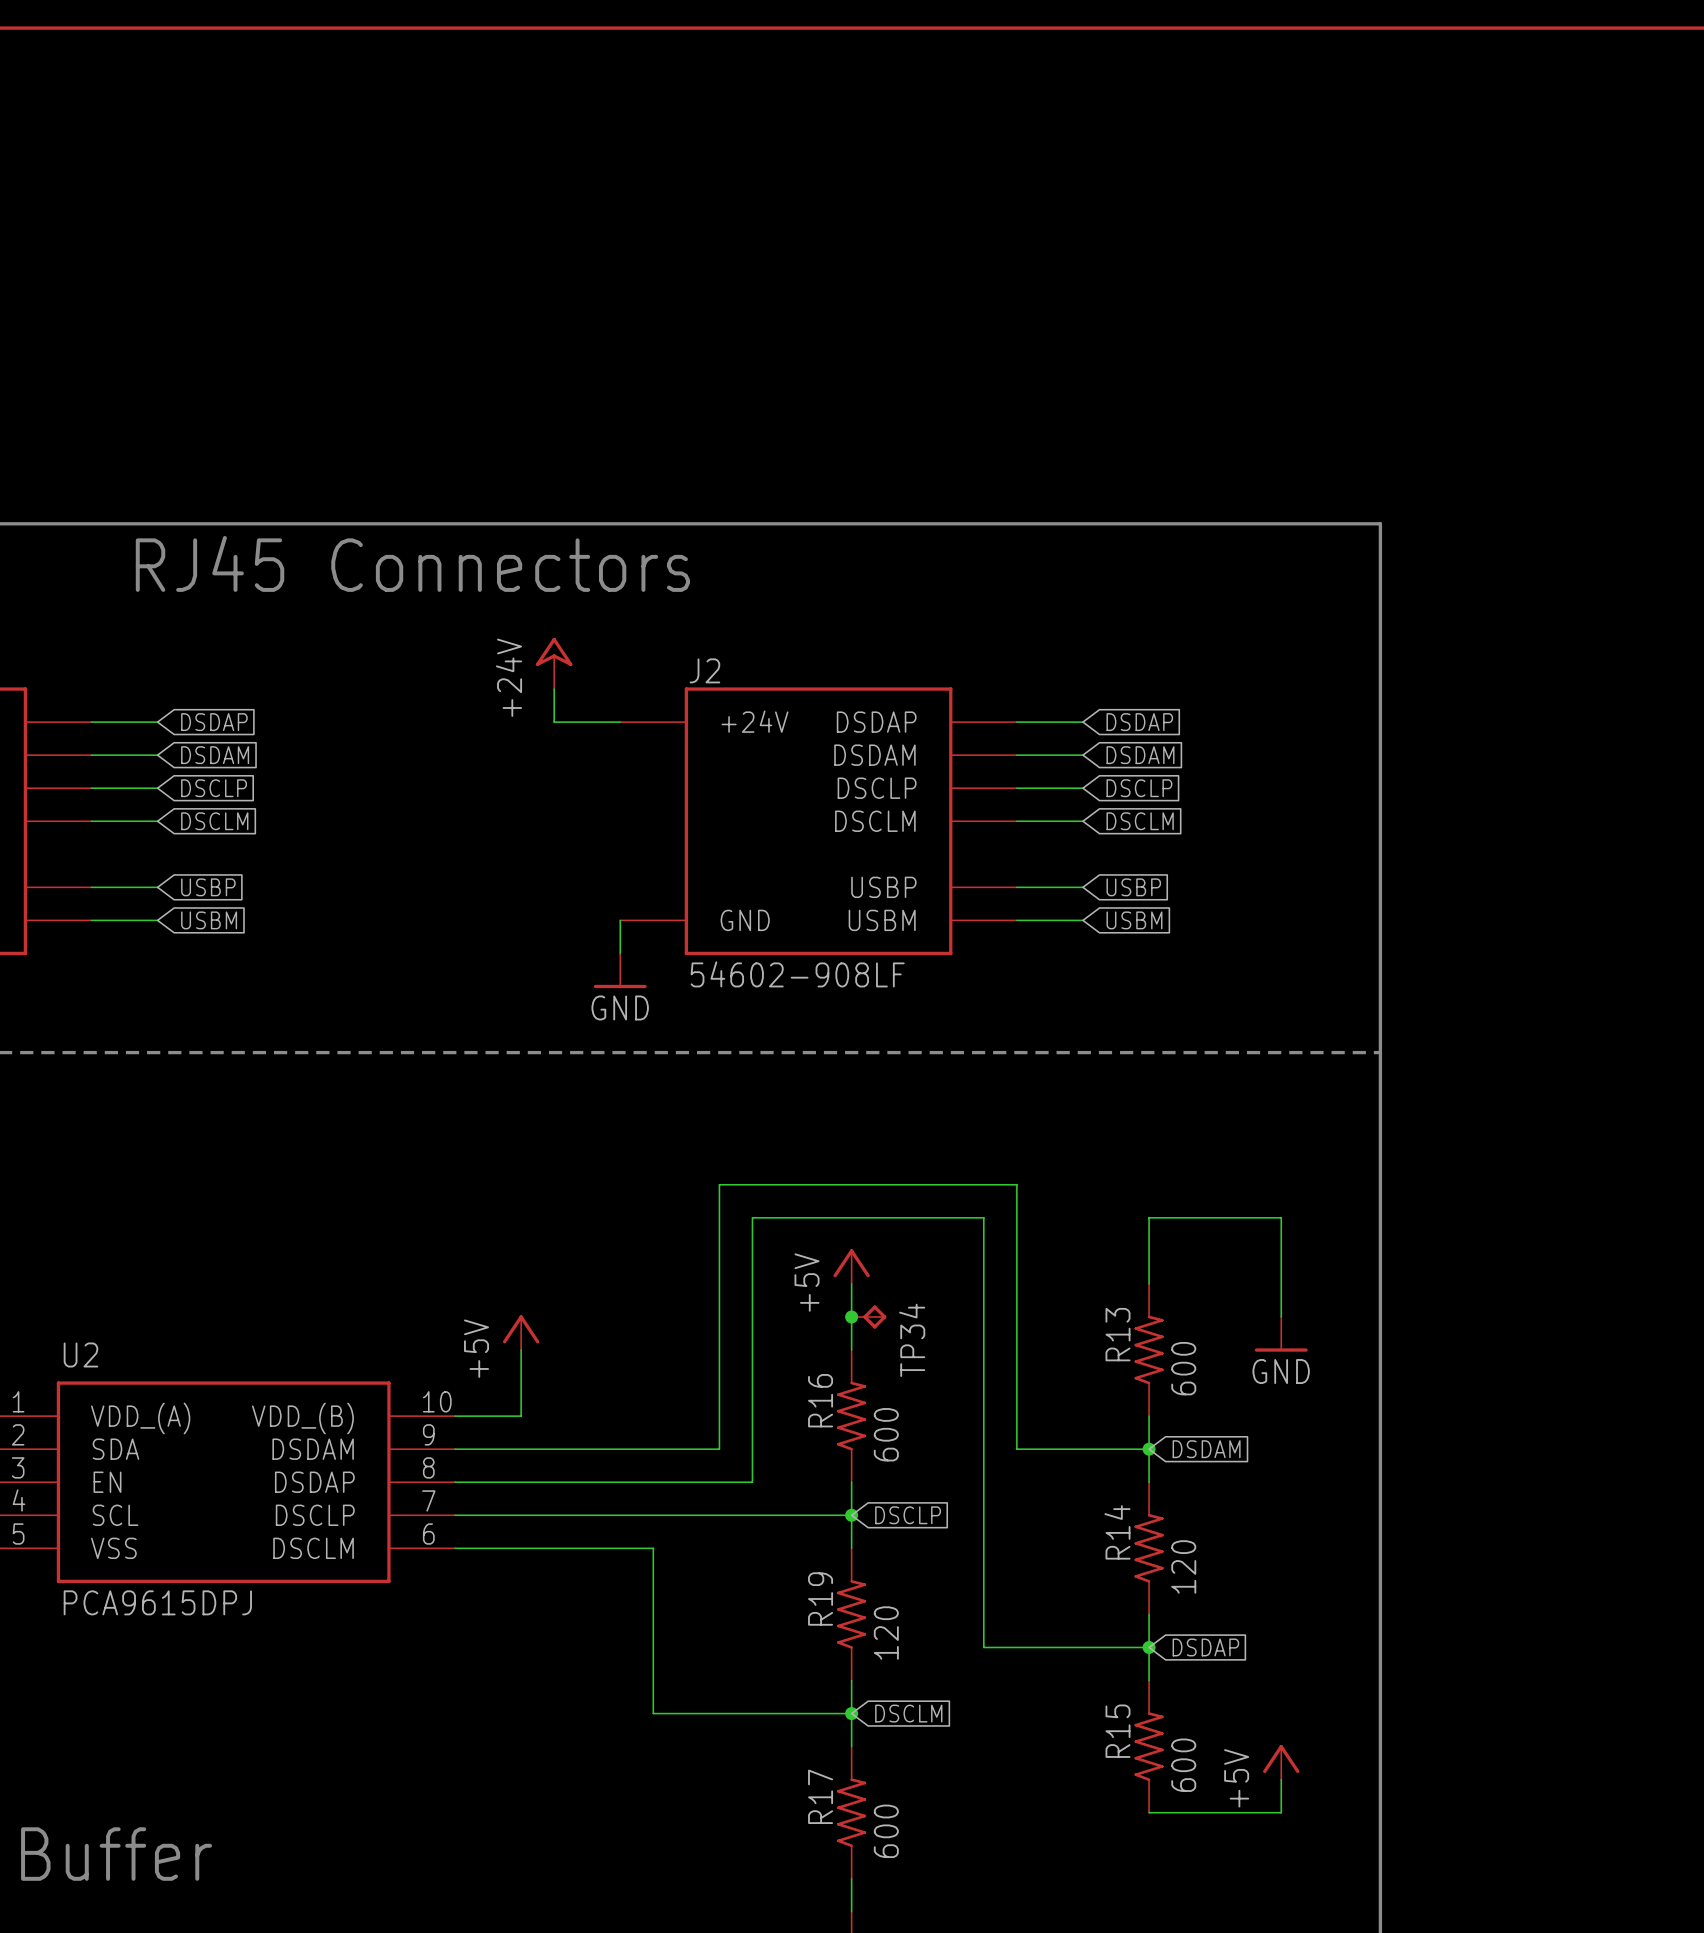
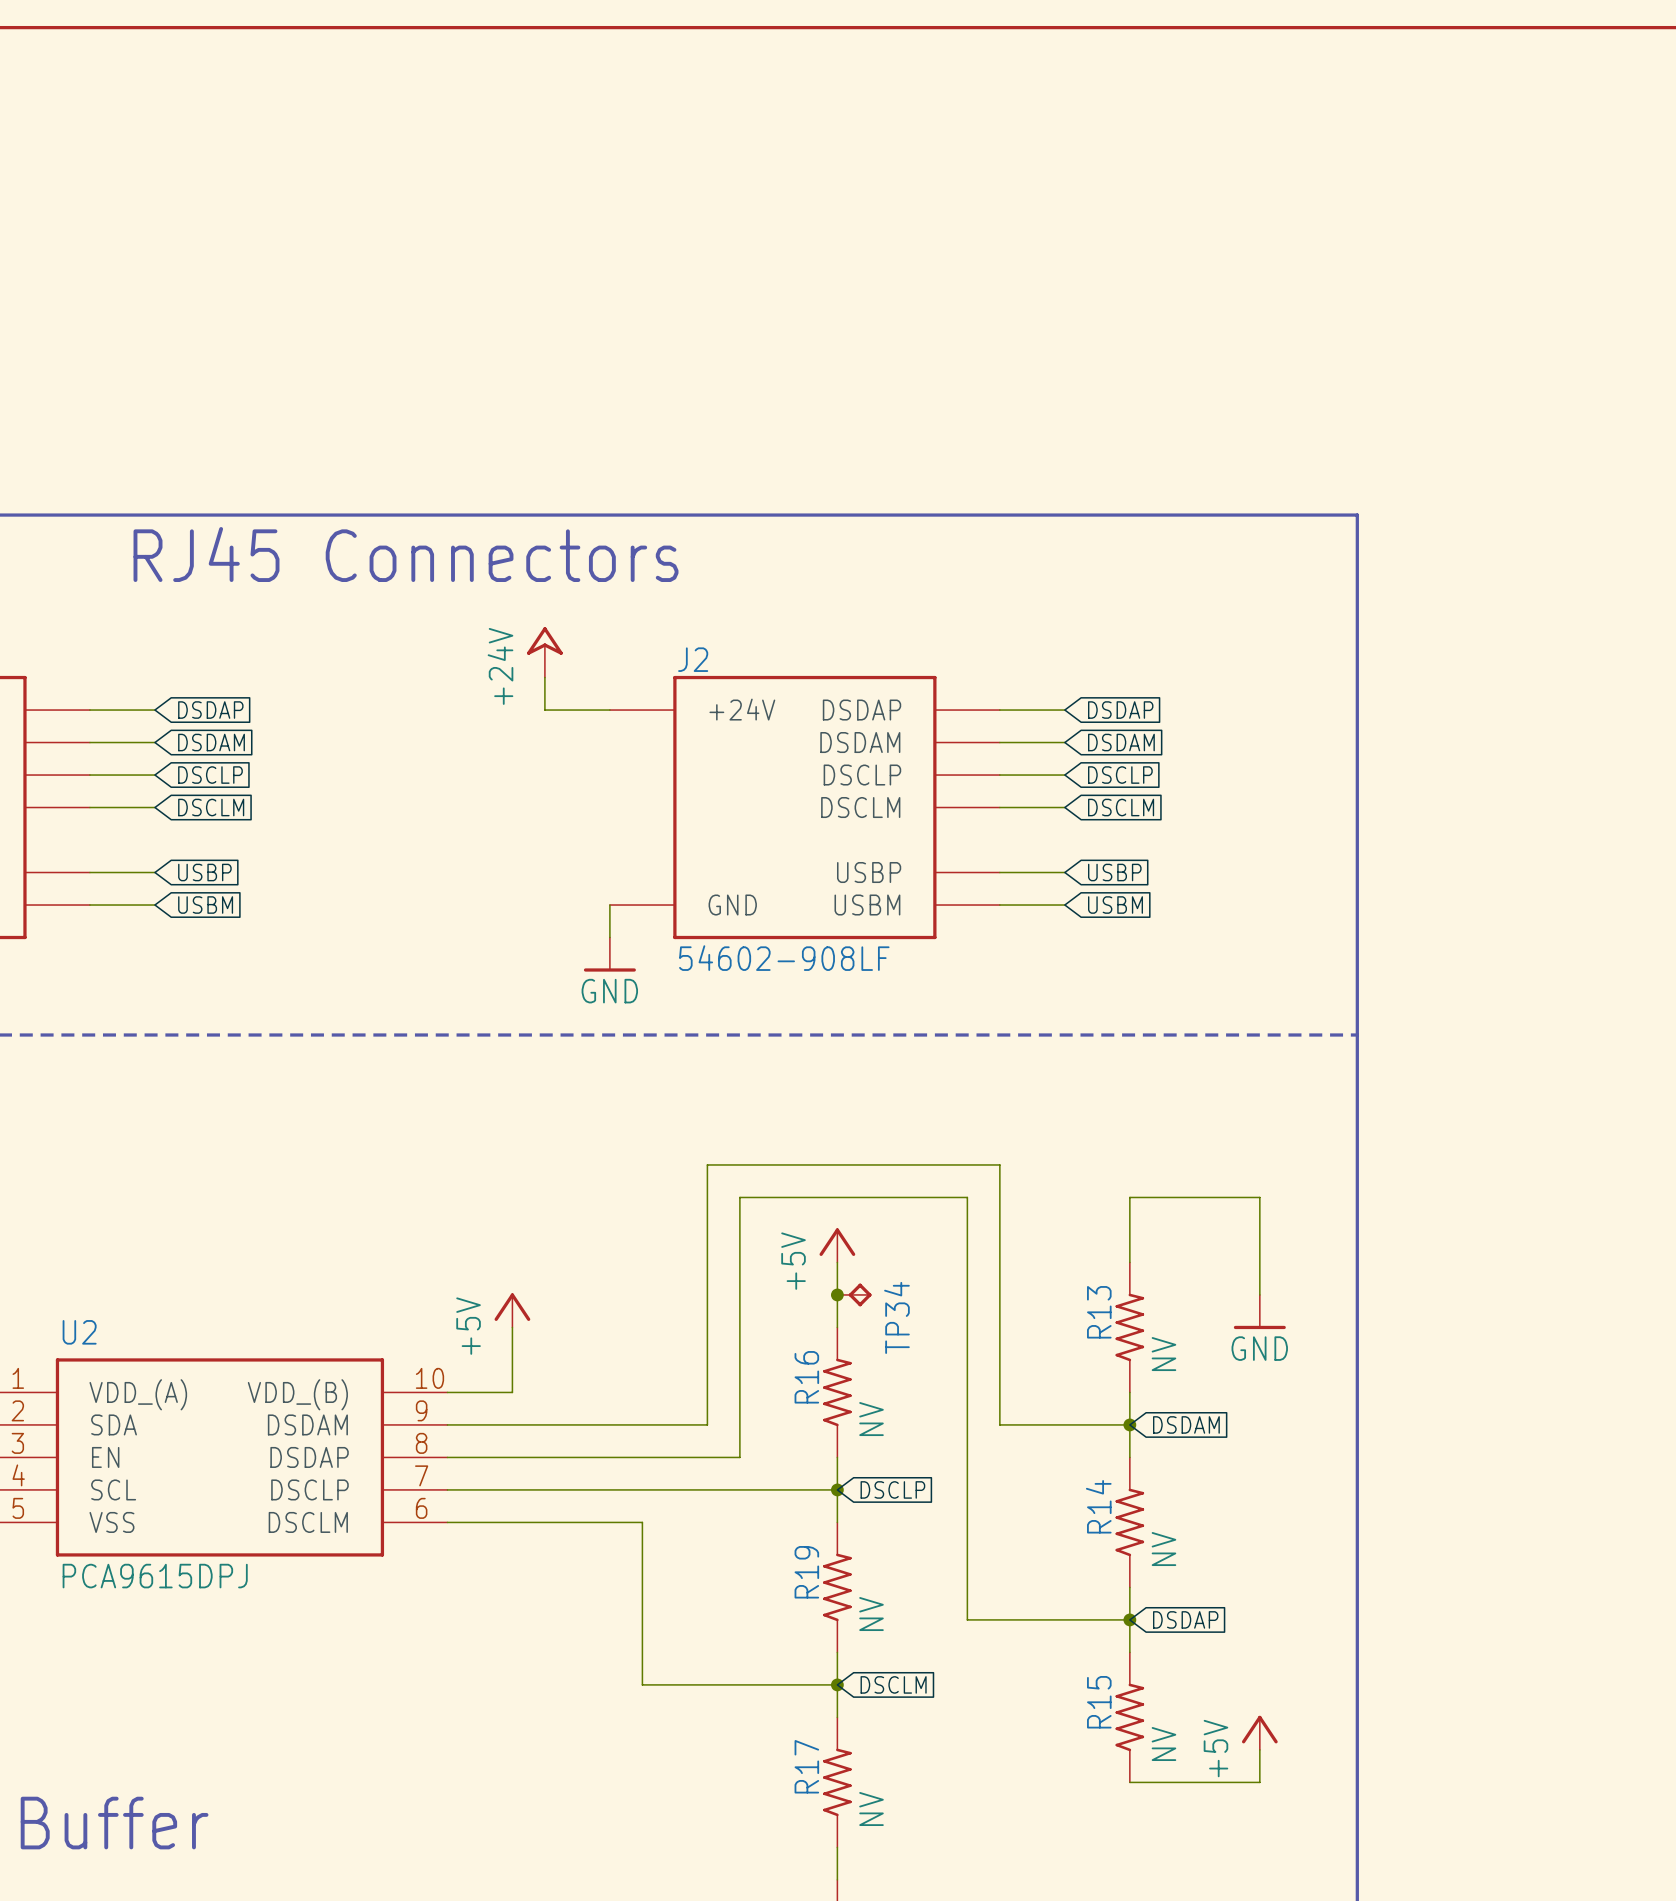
R13 value: 600 (1183, 1368) -> NV (1163, 1354)
R16 value: 600 (886, 1434) -> NV (871, 1419)
R14 value: 120 (1183, 1566) -> NV (1163, 1549)
R19 value: 120 (886, 1633) -> NV (871, 1614)
R15 value: 600 (1183, 1765) -> NV (1163, 1744)
R17 value: 600 (886, 1831) -> NV (871, 1809)

